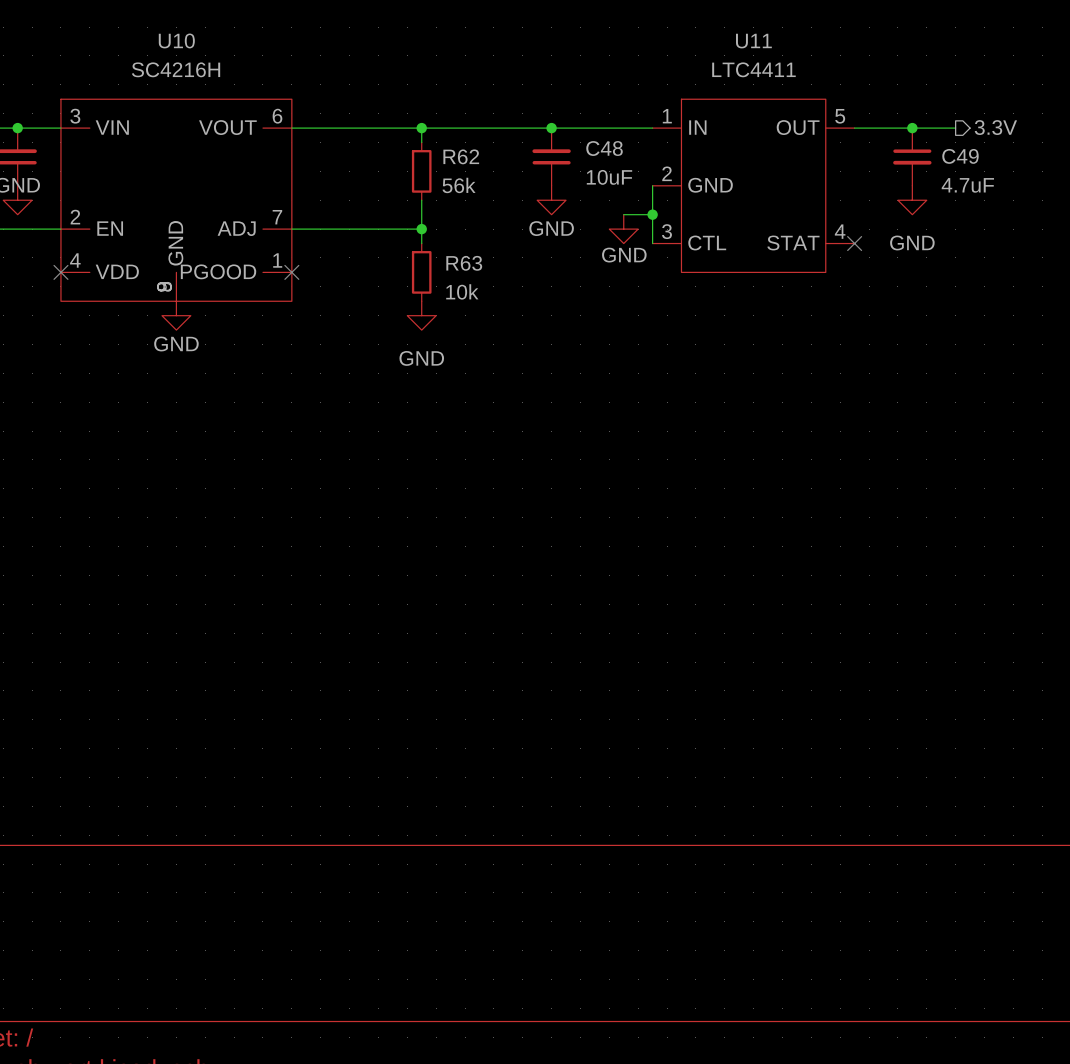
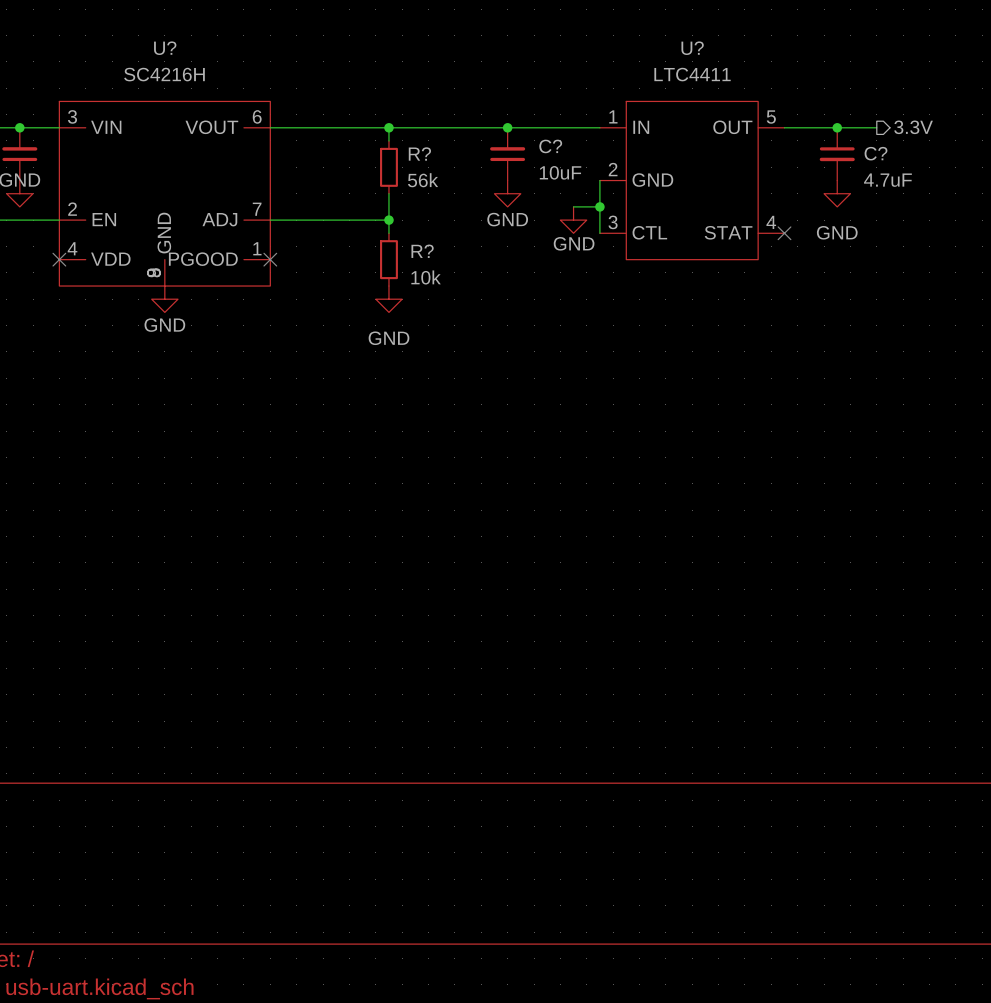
U10 name: U10 (176, 40) -> U? (165, 48)
U11 name: U11 (753, 41) -> U? (692, 48)
C48 name: C48 (604, 148) -> C? (550, 146)
R62 name: R62 (461, 156) -> R? (419, 154)
C49 name: C49 (960, 156) -> C? (875, 153)
R63 name: R63 (464, 263) -> R? (422, 251)

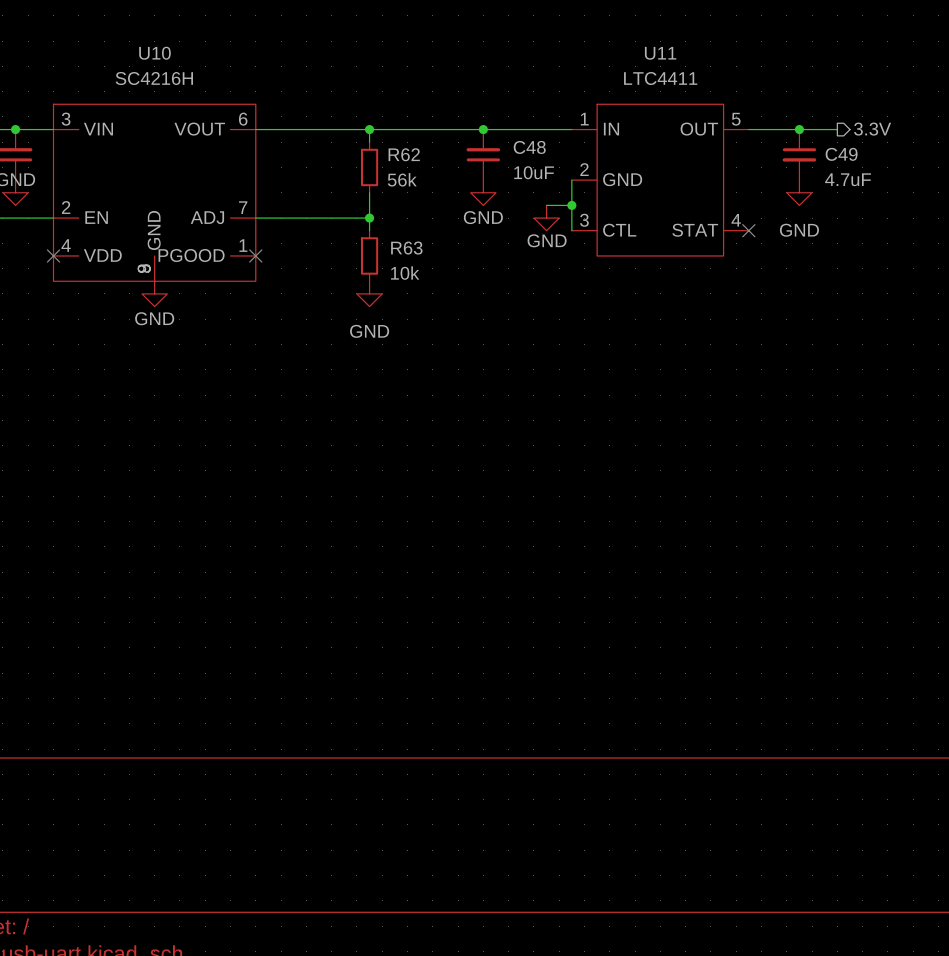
U? name: U? (165, 48) -> U10 (154, 53)
U? name: U? (692, 48) -> U11 (660, 53)
C? name: C? (550, 146) -> C48 (529, 147)
C? name: C? (875, 153) -> C49 (841, 154)
R? name: R? (419, 154) -> R62 (404, 154)
R? name: R? (422, 251) -> R63 (406, 248)

